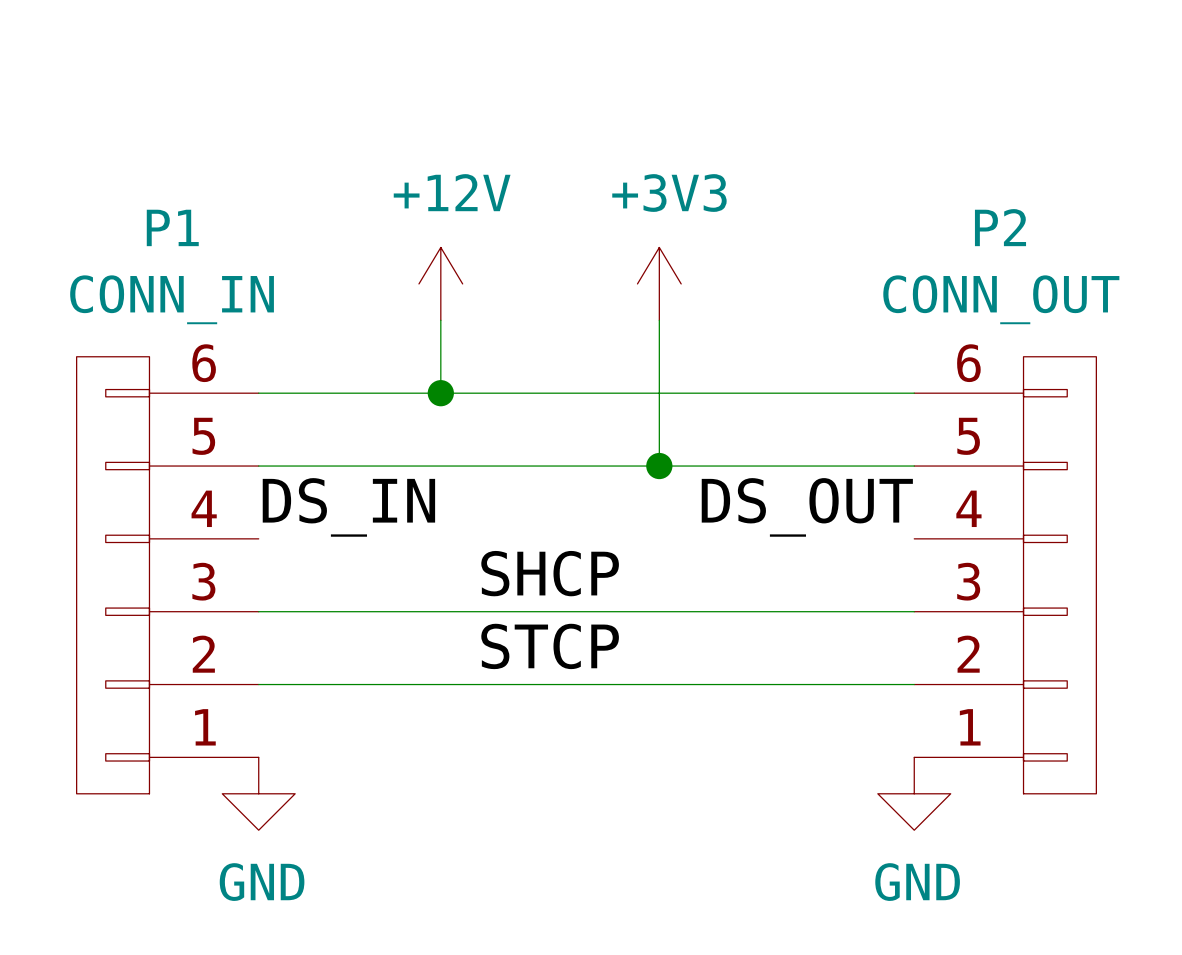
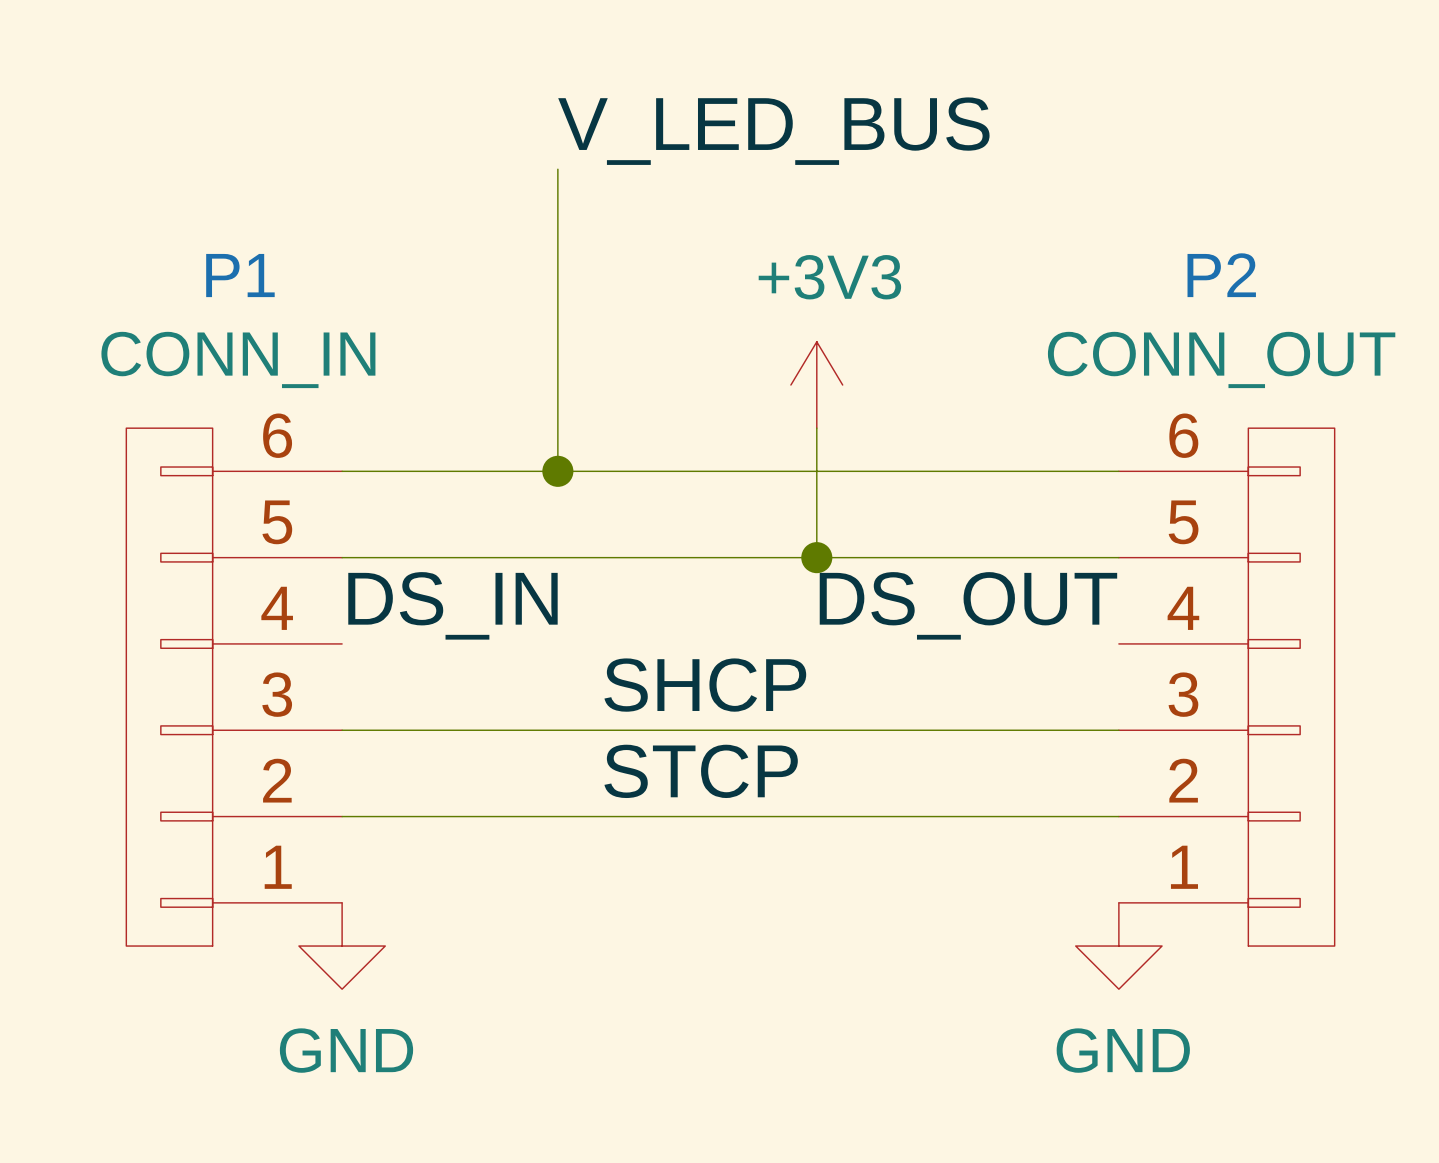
label: none -> V_LED_BUS (773, 131)
wire: none -> (557, 169) (557, 385)
power symbol: +12V (440, 283) -> none
power symbol position: +3V3 (659, 283) -> +3V3 (816, 385)

